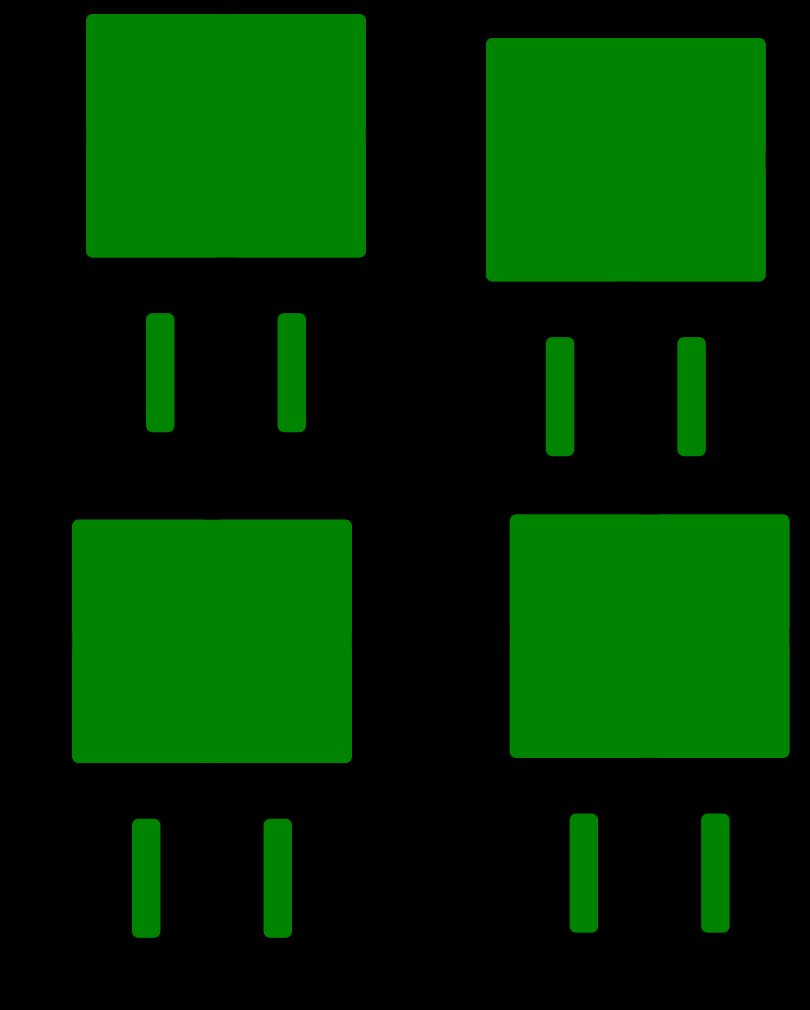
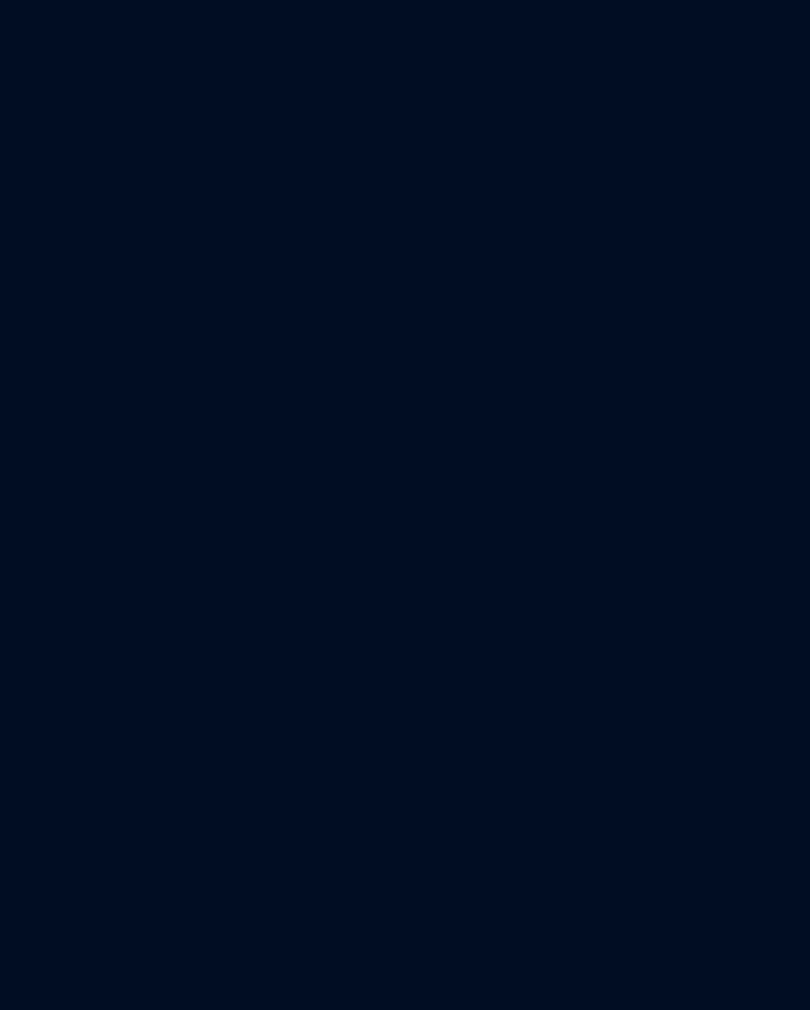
part: (226, 223) -> none
part: (625, 247) -> none
part: (649, 723) -> none
part: (212, 728) -> none

